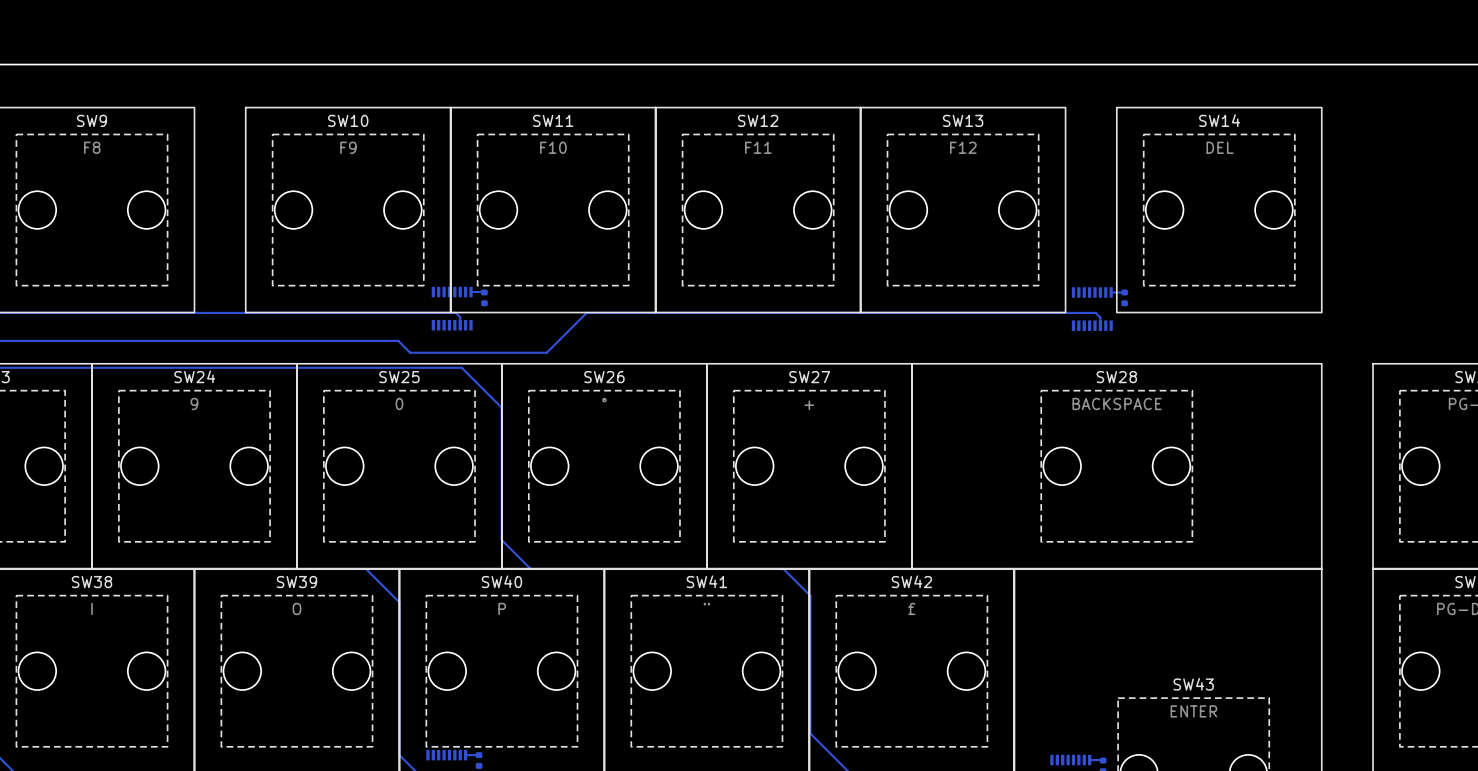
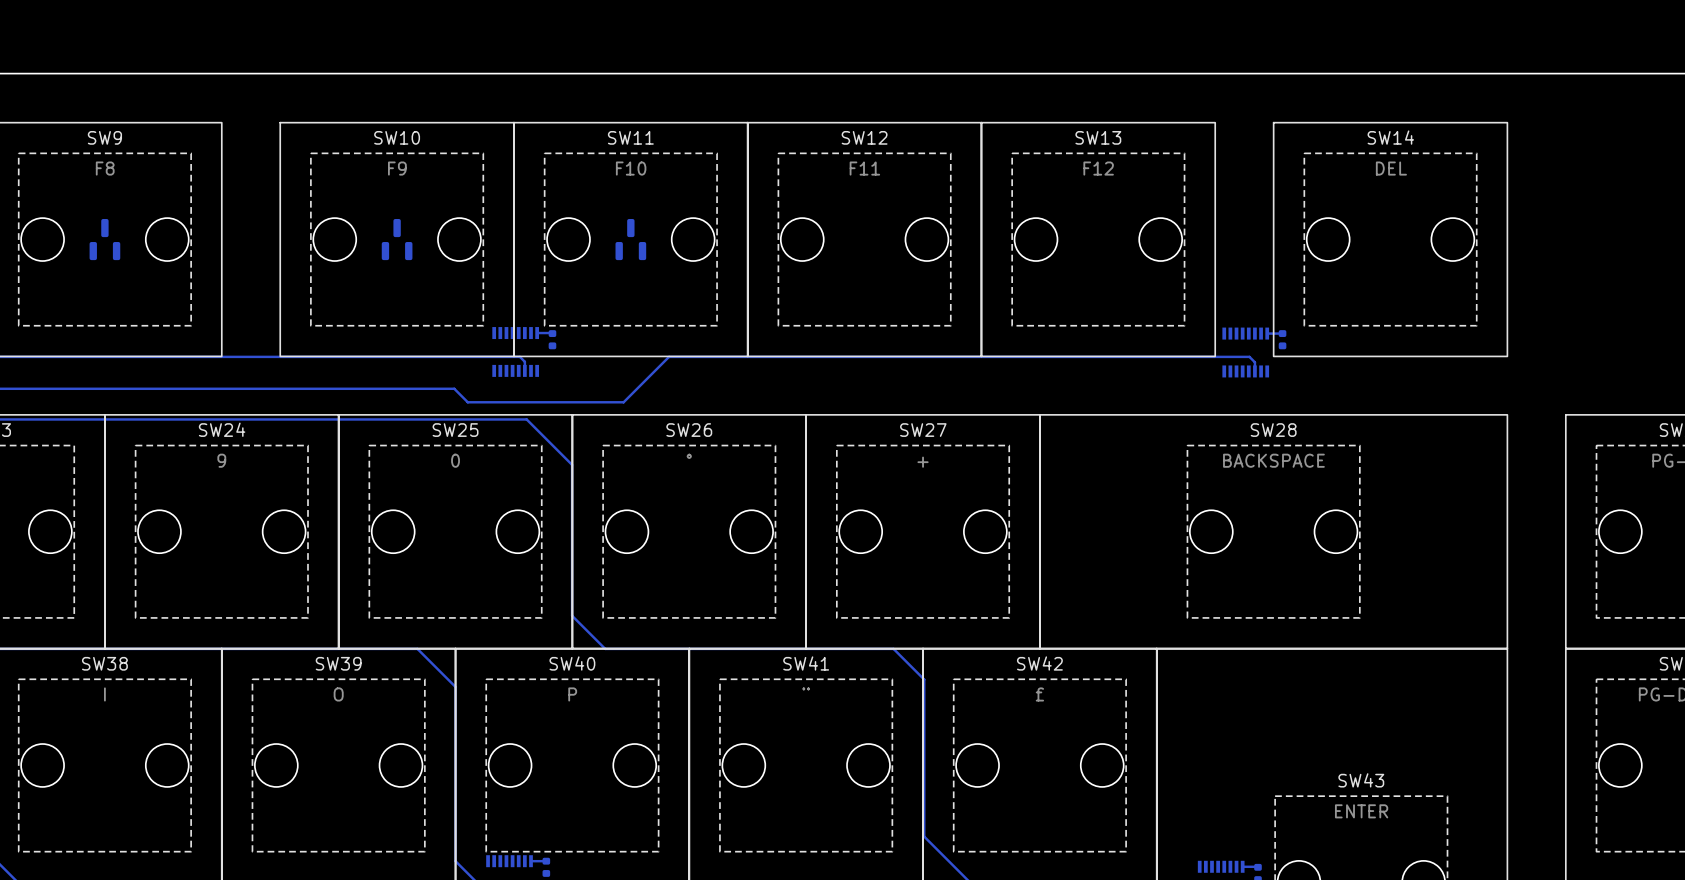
part: none -> (104, 239)
part: none -> (397, 239)
part: none -> (630, 239)

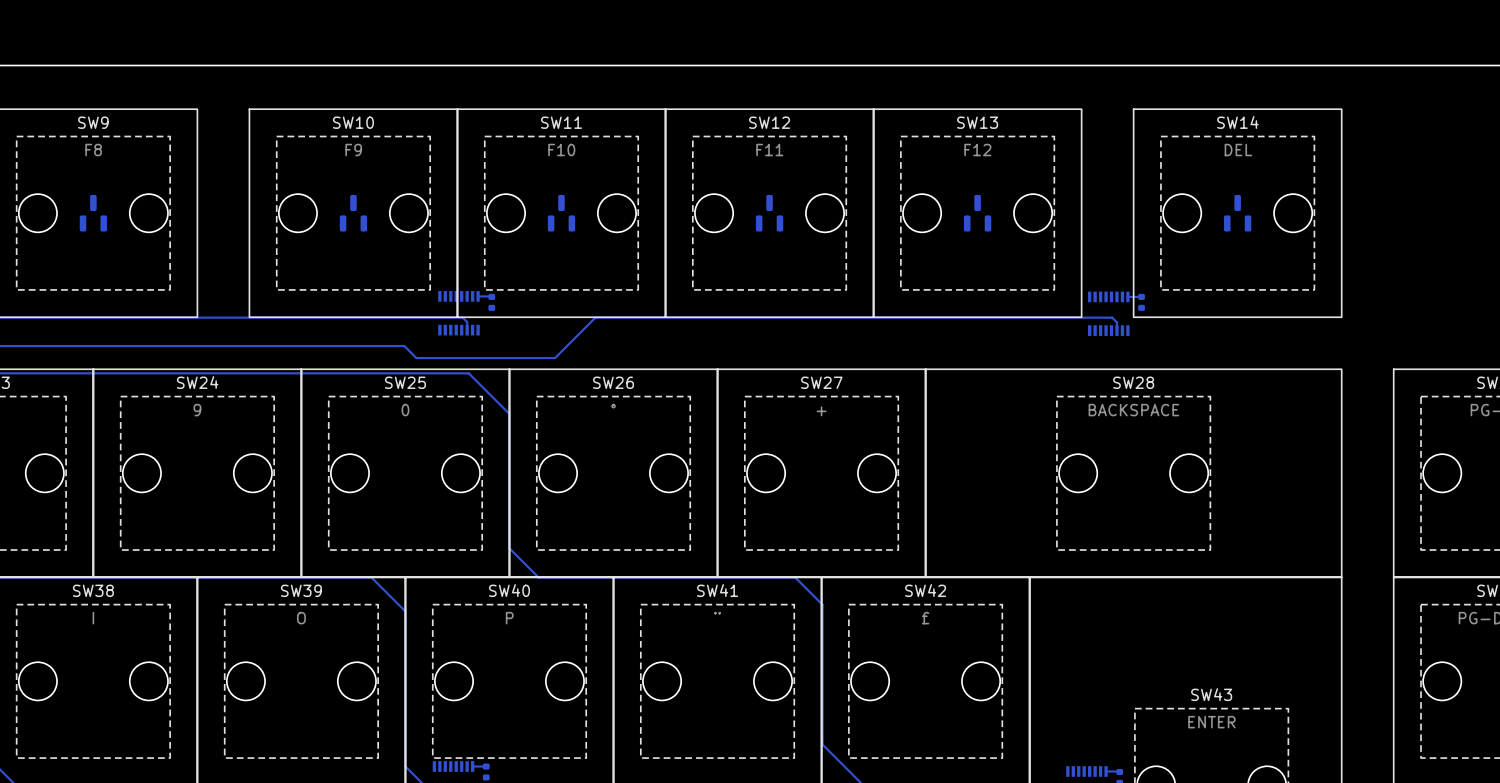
part: none -> (769, 213)
part: none -> (977, 213)
part: none -> (1237, 213)

